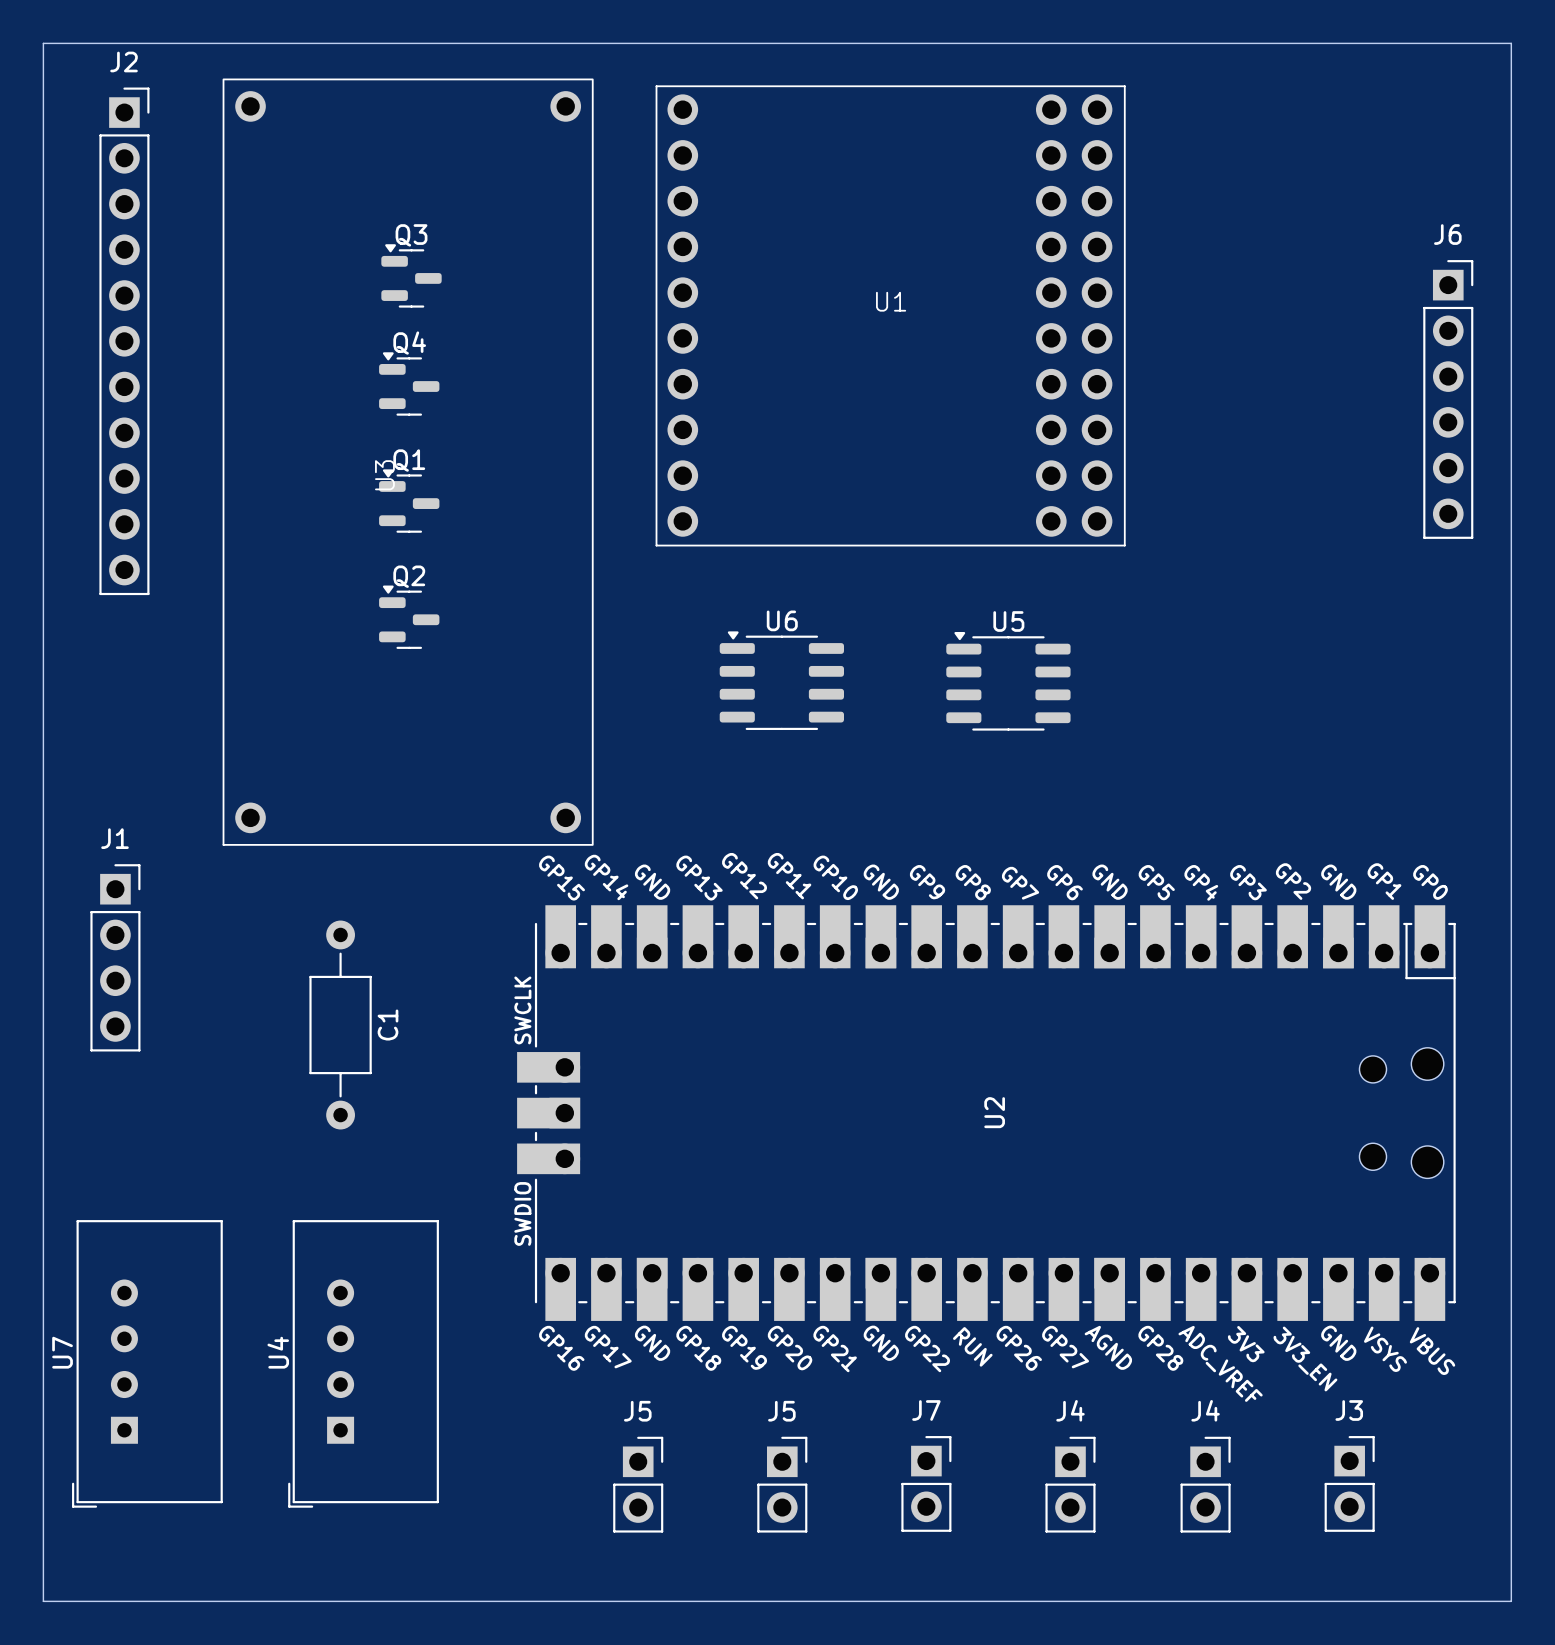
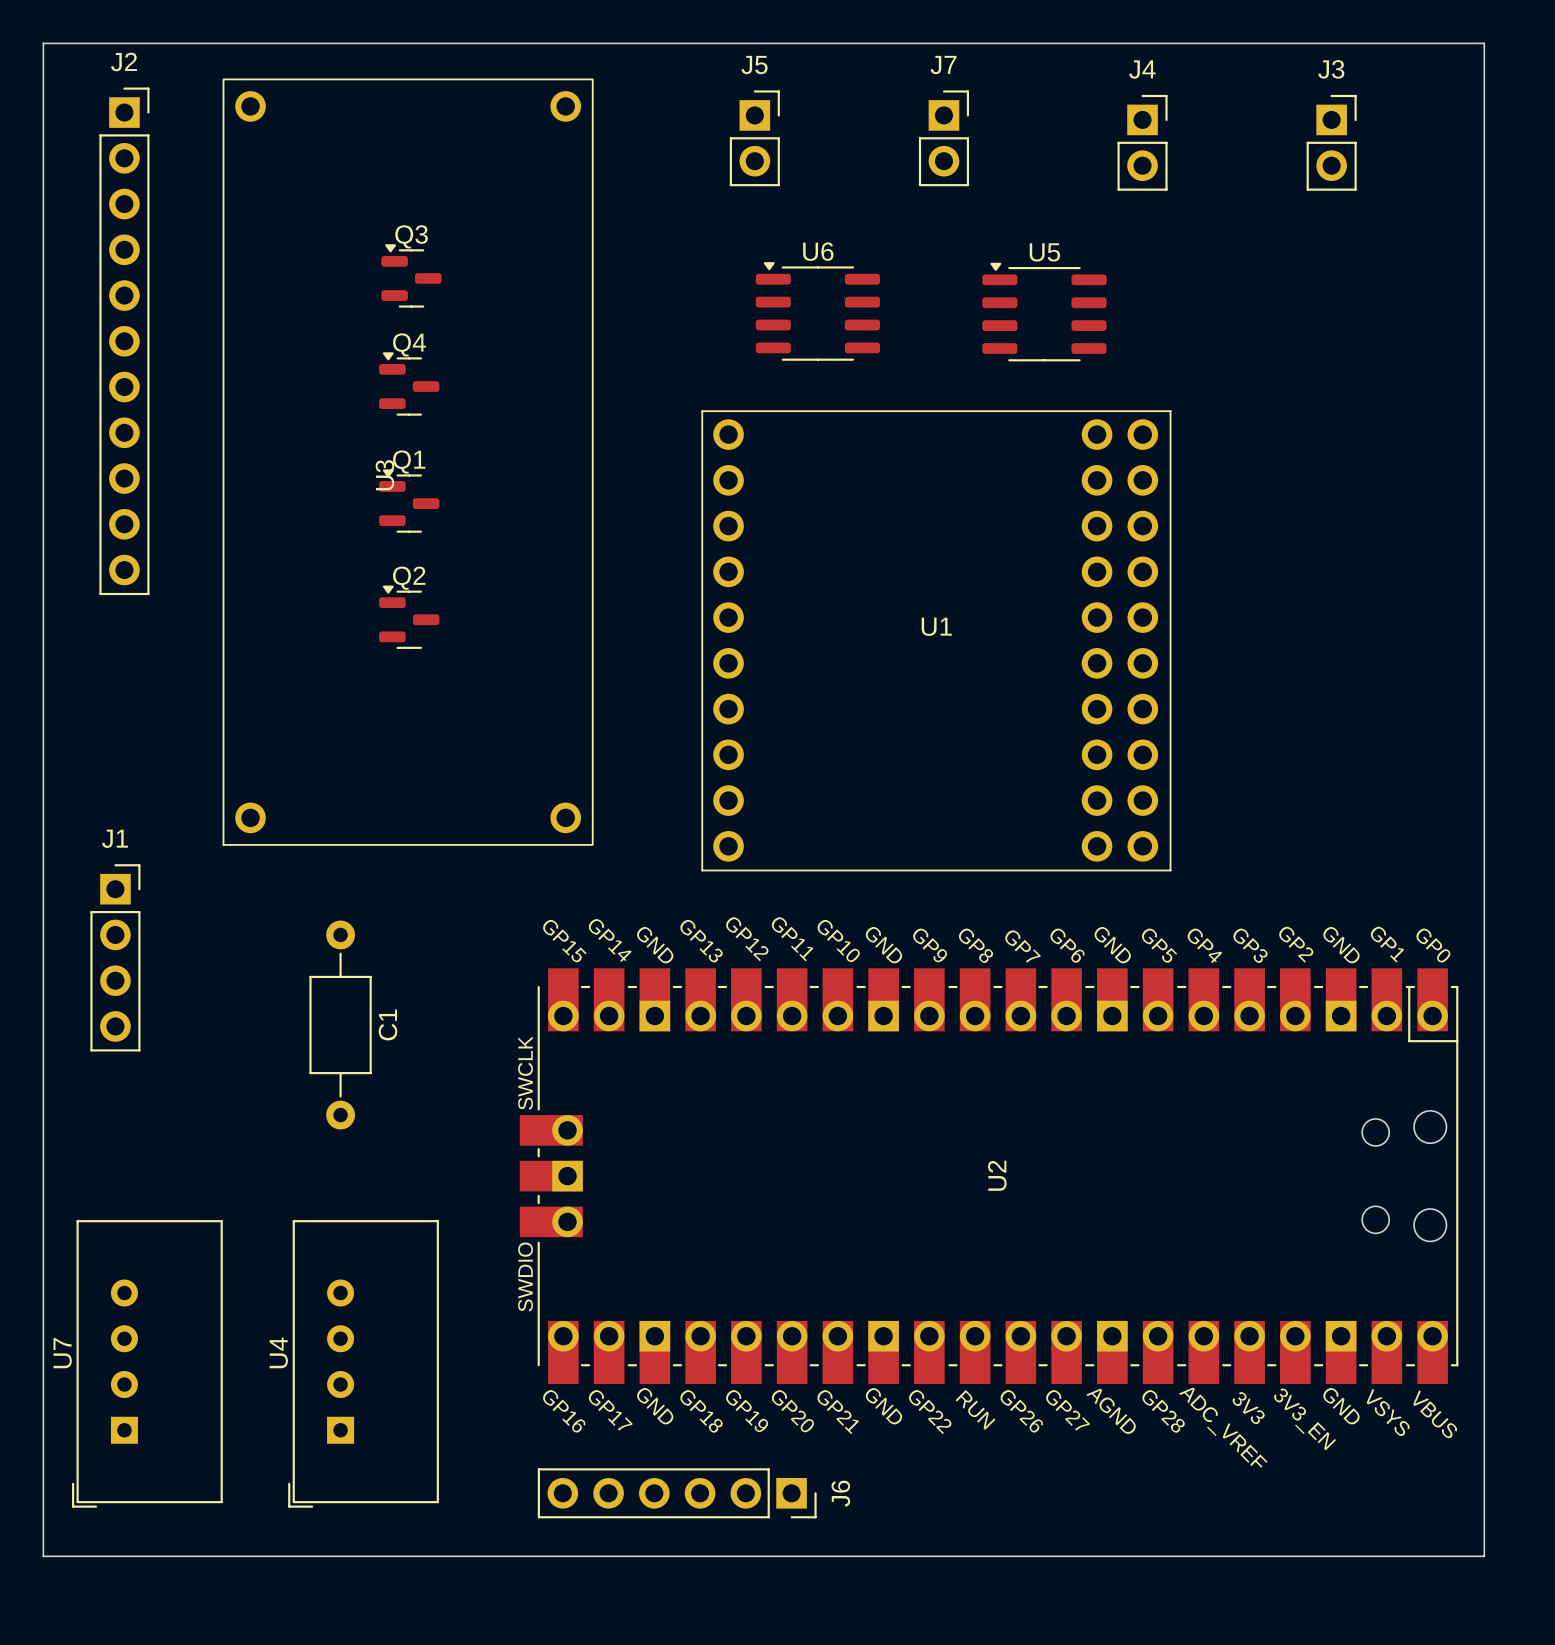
board edge: (1484, 43) (1511, 43) (1511, 1601) (43, 1601) (43, 1556) -> (1484, 43) (1484, 1556) (43, 1556)
J5: none -> (754, 138)
J4: none -> (1142, 142)
U1 position: (890, 315) -> (936, 640)
J6 rotation: 0° (1448, 399) -> 90° clockwise (677, 1493)
J6 position: (1448, 399) -> (677, 1493)
U6 position: (781, 680) -> (817, 311)
U5 position: (1008, 681) -> (1044, 312)
U2 position: (986, 1113) -> (989, 1176)
U2 text position: 3V3_EN (1305, 1358) -> 3V3_EN (1304, 1419)
J7 position: (926, 1483) -> (943, 138)
J3 position: (1349, 1483) -> (1331, 142)
J5: (638, 1484) -> none
J5: (782, 1484) -> none
J4: (1070, 1484) -> none
J4: (1205, 1484) -> none

